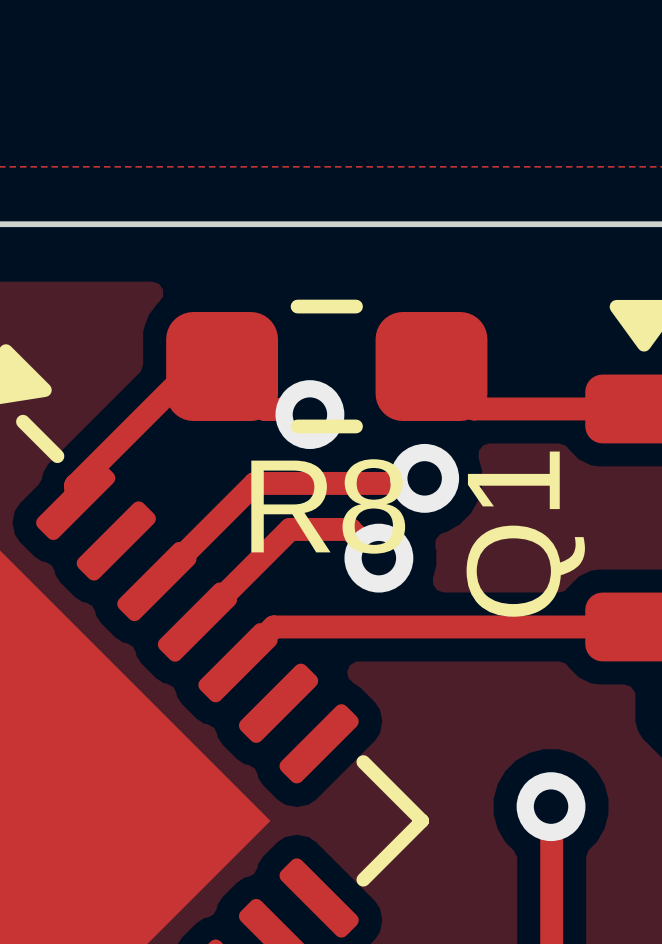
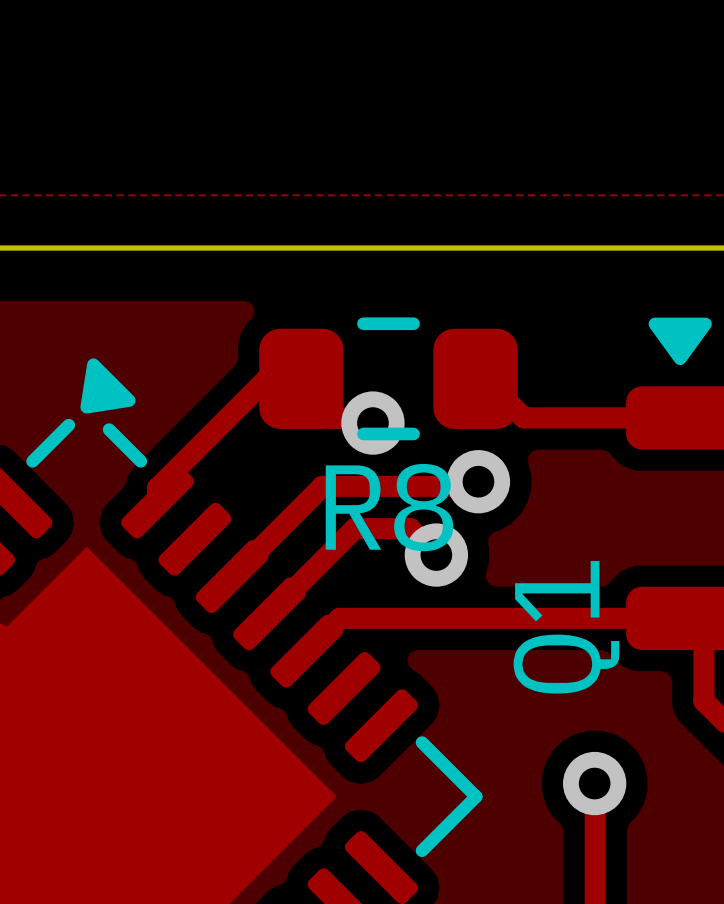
R8 footprint: [166, 299, 488, 434] -> [259, 317, 518, 441]
Q1 name position: Q1 (525, 534) -> Q1 (566, 627)

